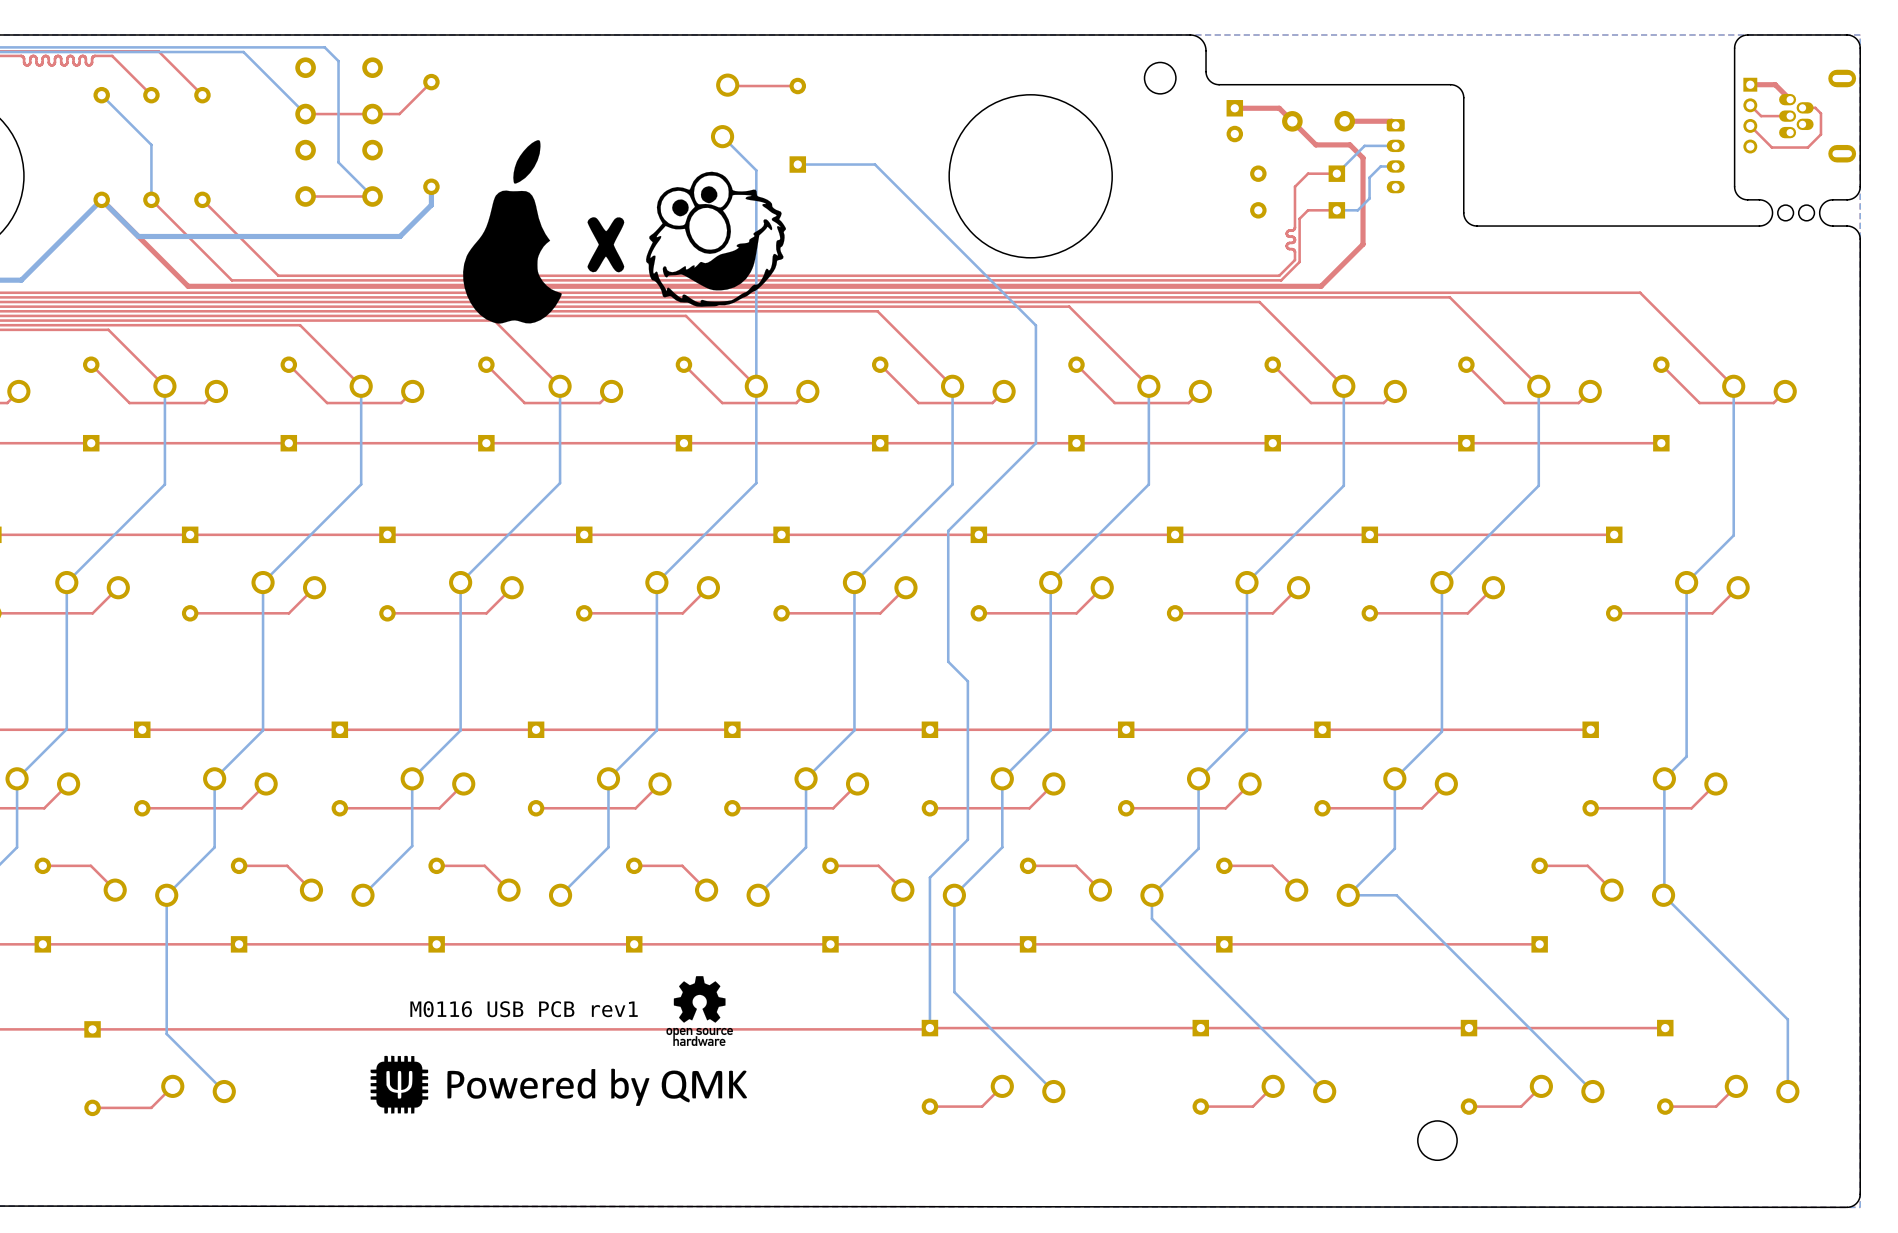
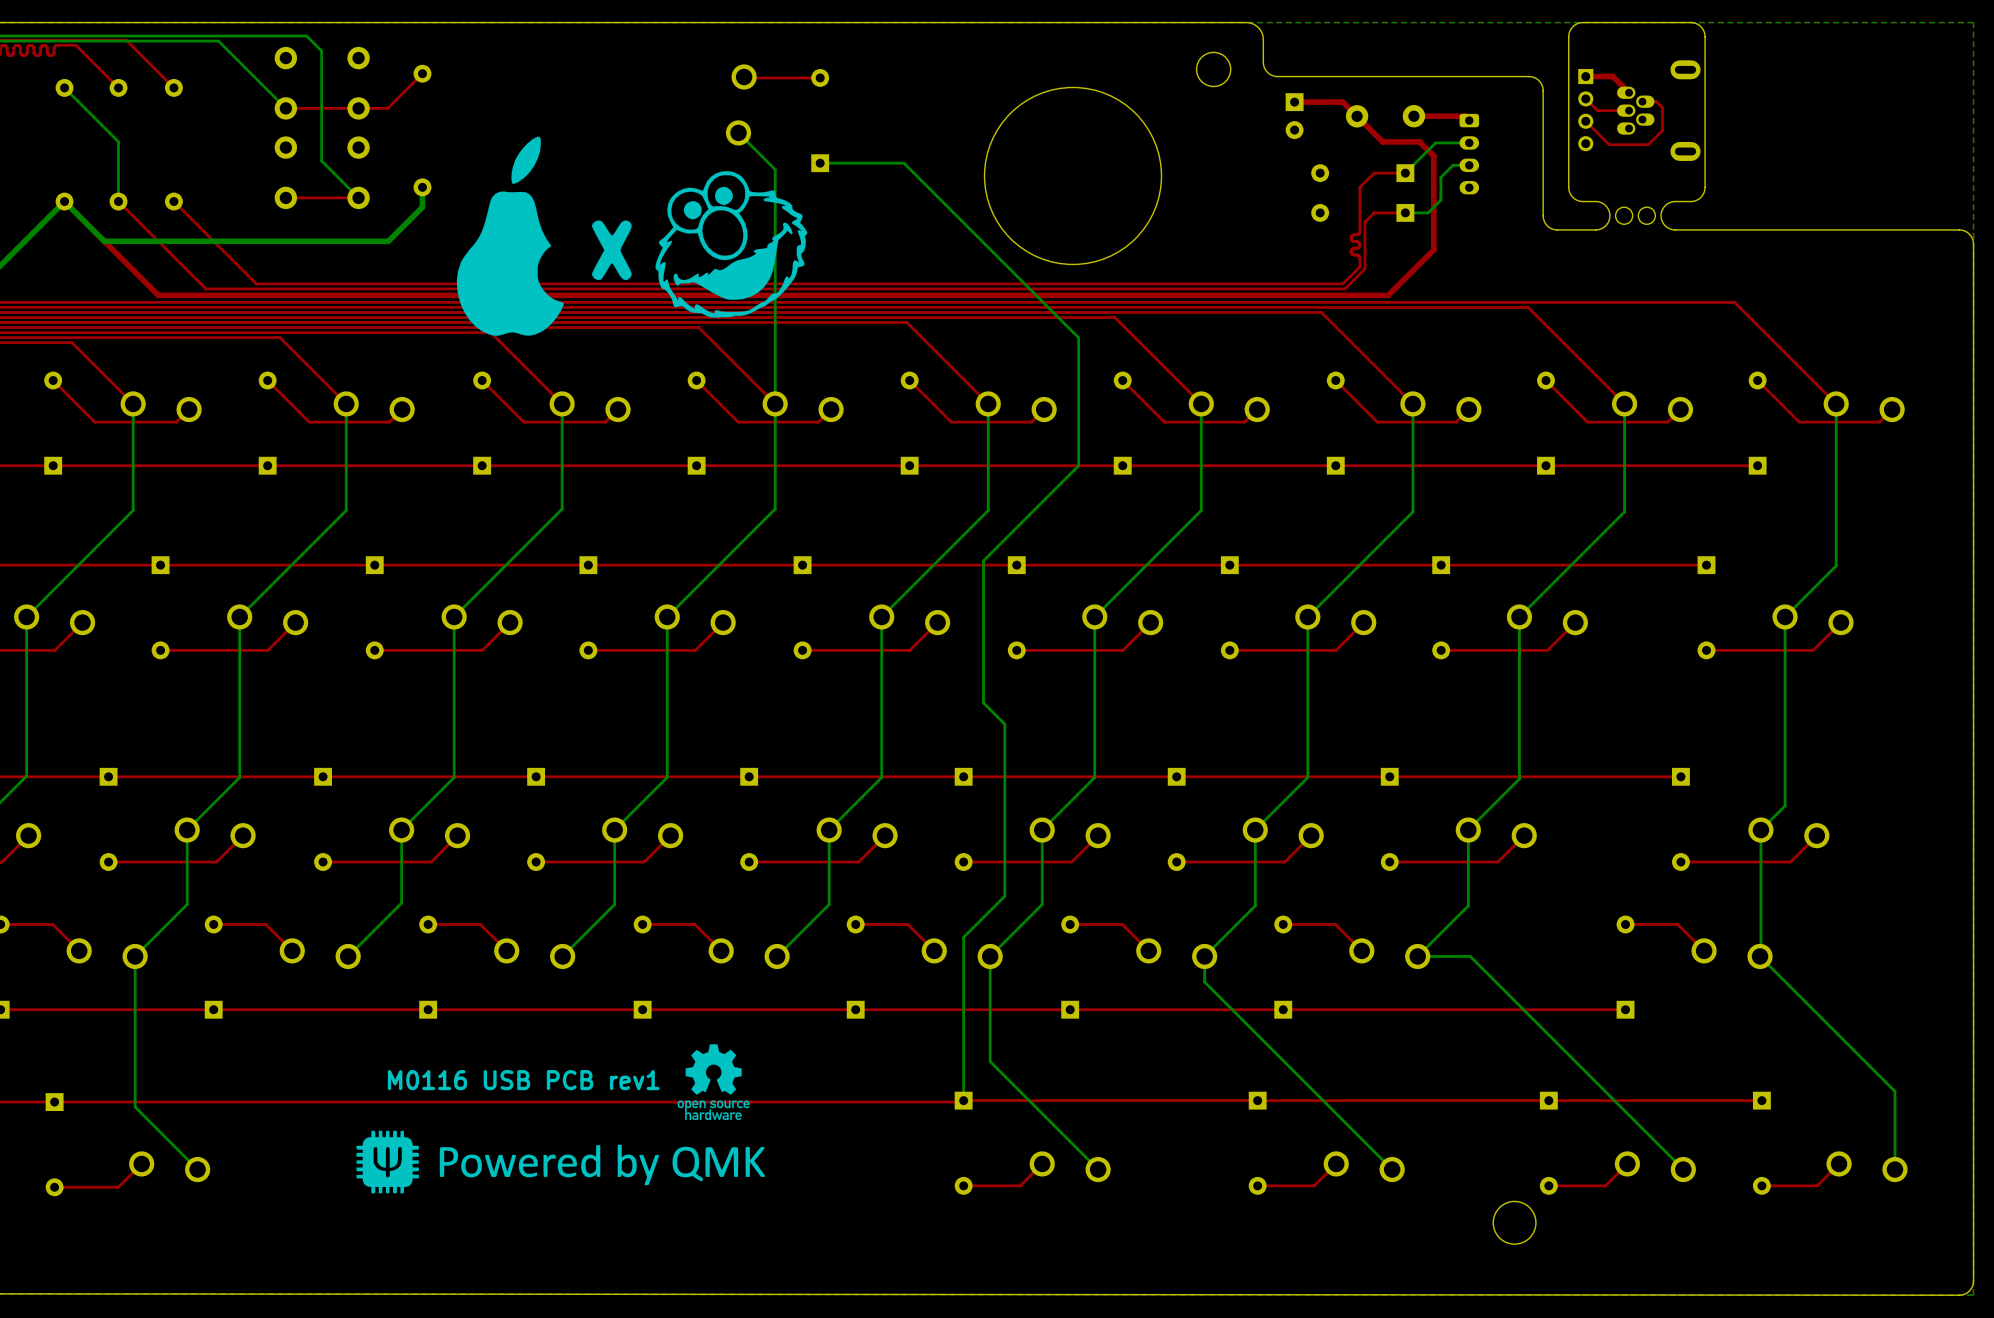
top track: (1750, 84) (1775, 84) (1790, 99) (1786, 99) -> (1585, 76) (1612, 76) (1629, 92) (1624, 92)
top track: (1750, 105) (1761, 116) (1790, 116) -> (1585, 98) (1597, 110) (1629, 110)
top track: (1802, 107) (1815, 107) (1820, 113) (1820, 134) (1807, 147) (1771, 147) (1750, 125) -> (1642, 101) (1656, 101) (1662, 107) (1662, 130) (1648, 144) (1609, 144) (1585, 121)
part position: (1750, 115) -> (1585, 110)
part position: (1817, 116) -> (1658, 110)
round board edge: none -> [1615, 206, 1633, 225]
round board edge: none -> [1638, 206, 1656, 225]
round board edge: [1777, 204, 1794, 222] -> none
round board edge: [1798, 204, 1815, 222] -> none
board edge: (1585, 226) (1512, 226) -> (1675, 229) (1668, 228) (1662, 221) (1661, 213) (1663, 207) (1671, 202) (1696, 200) (1702, 195) (1704, 189) (1704, 34) (1700, 26) (1692, 22) (1581, 22) (1574, 25) (1569, 31) (1568, 189) (1575, 199) (1599, 202) (1608, 208) (1609, 215) (1608, 222) (1602, 228) (1595, 229)
board edge: (1832, 226) (1826, 224) (1821, 219) (1819, 211) (1822, 204) (1829, 200) (1852, 198) (1857, 194) (1860, 188) (1860, 46) (1856, 38) (1848, 35) (1745, 35) (1739, 37) (1735, 43) (1734, 188) (1741, 198) (1762, 200) (1770, 206) (1772, 212) (1770, 219) (1766, 224) (1759, 226) -> (1943, 229) (1864, 229)

